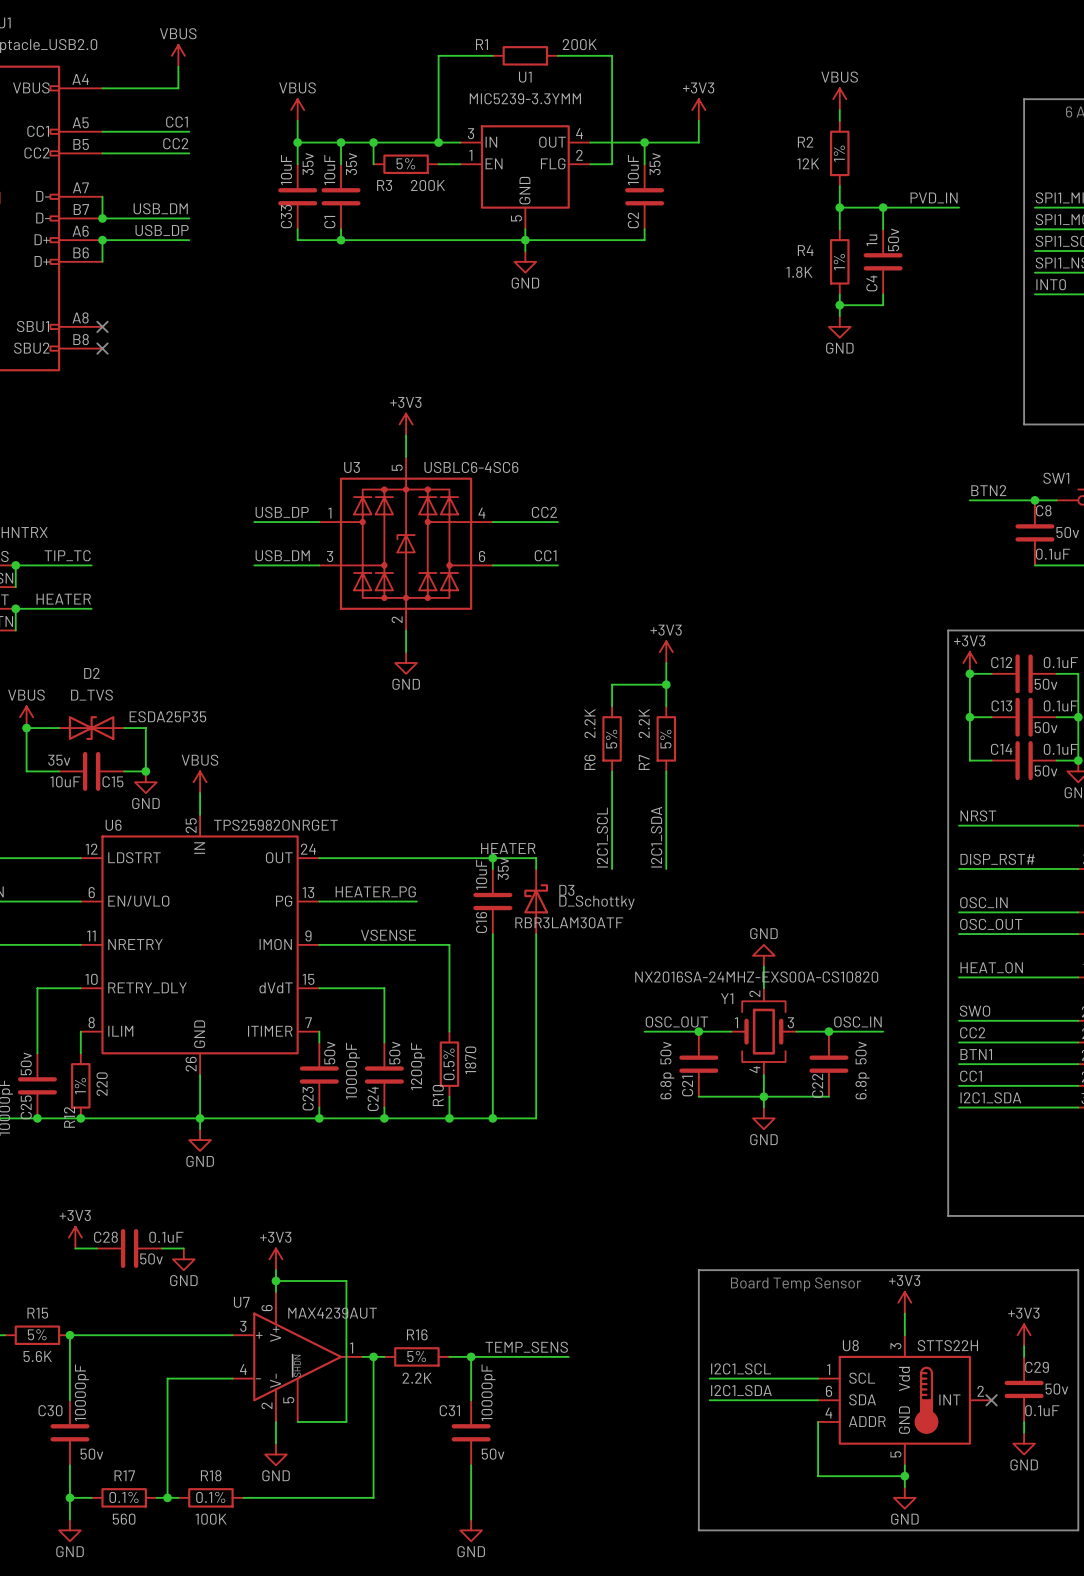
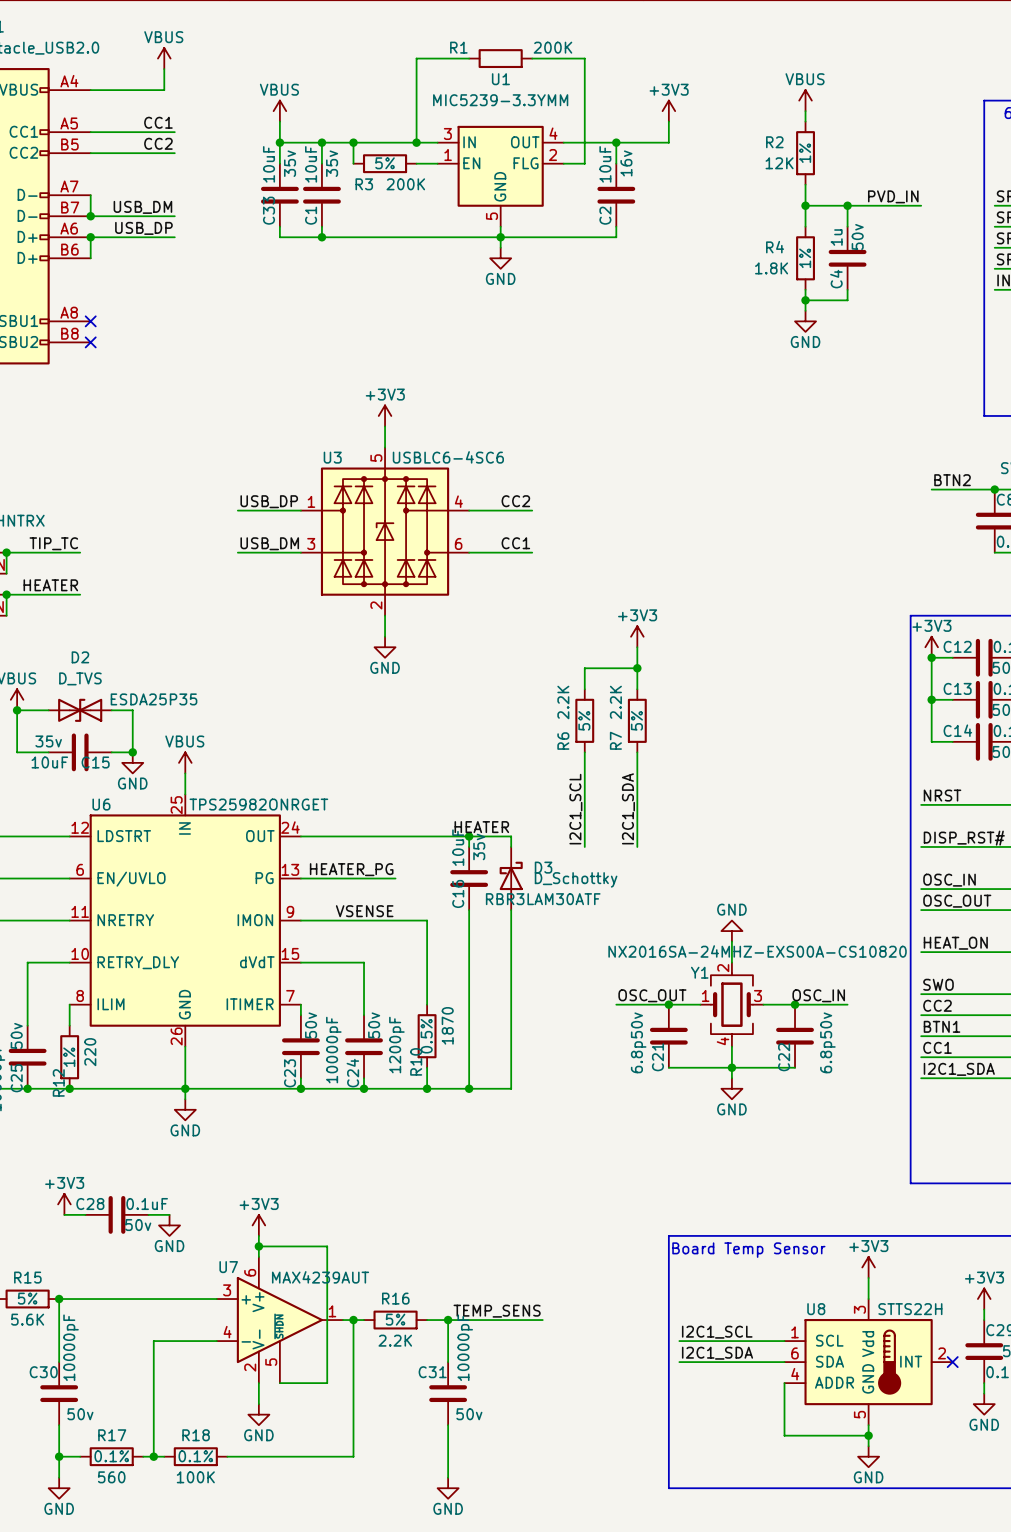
C2 text: 35v (655, 164) -> 16v (626, 163)

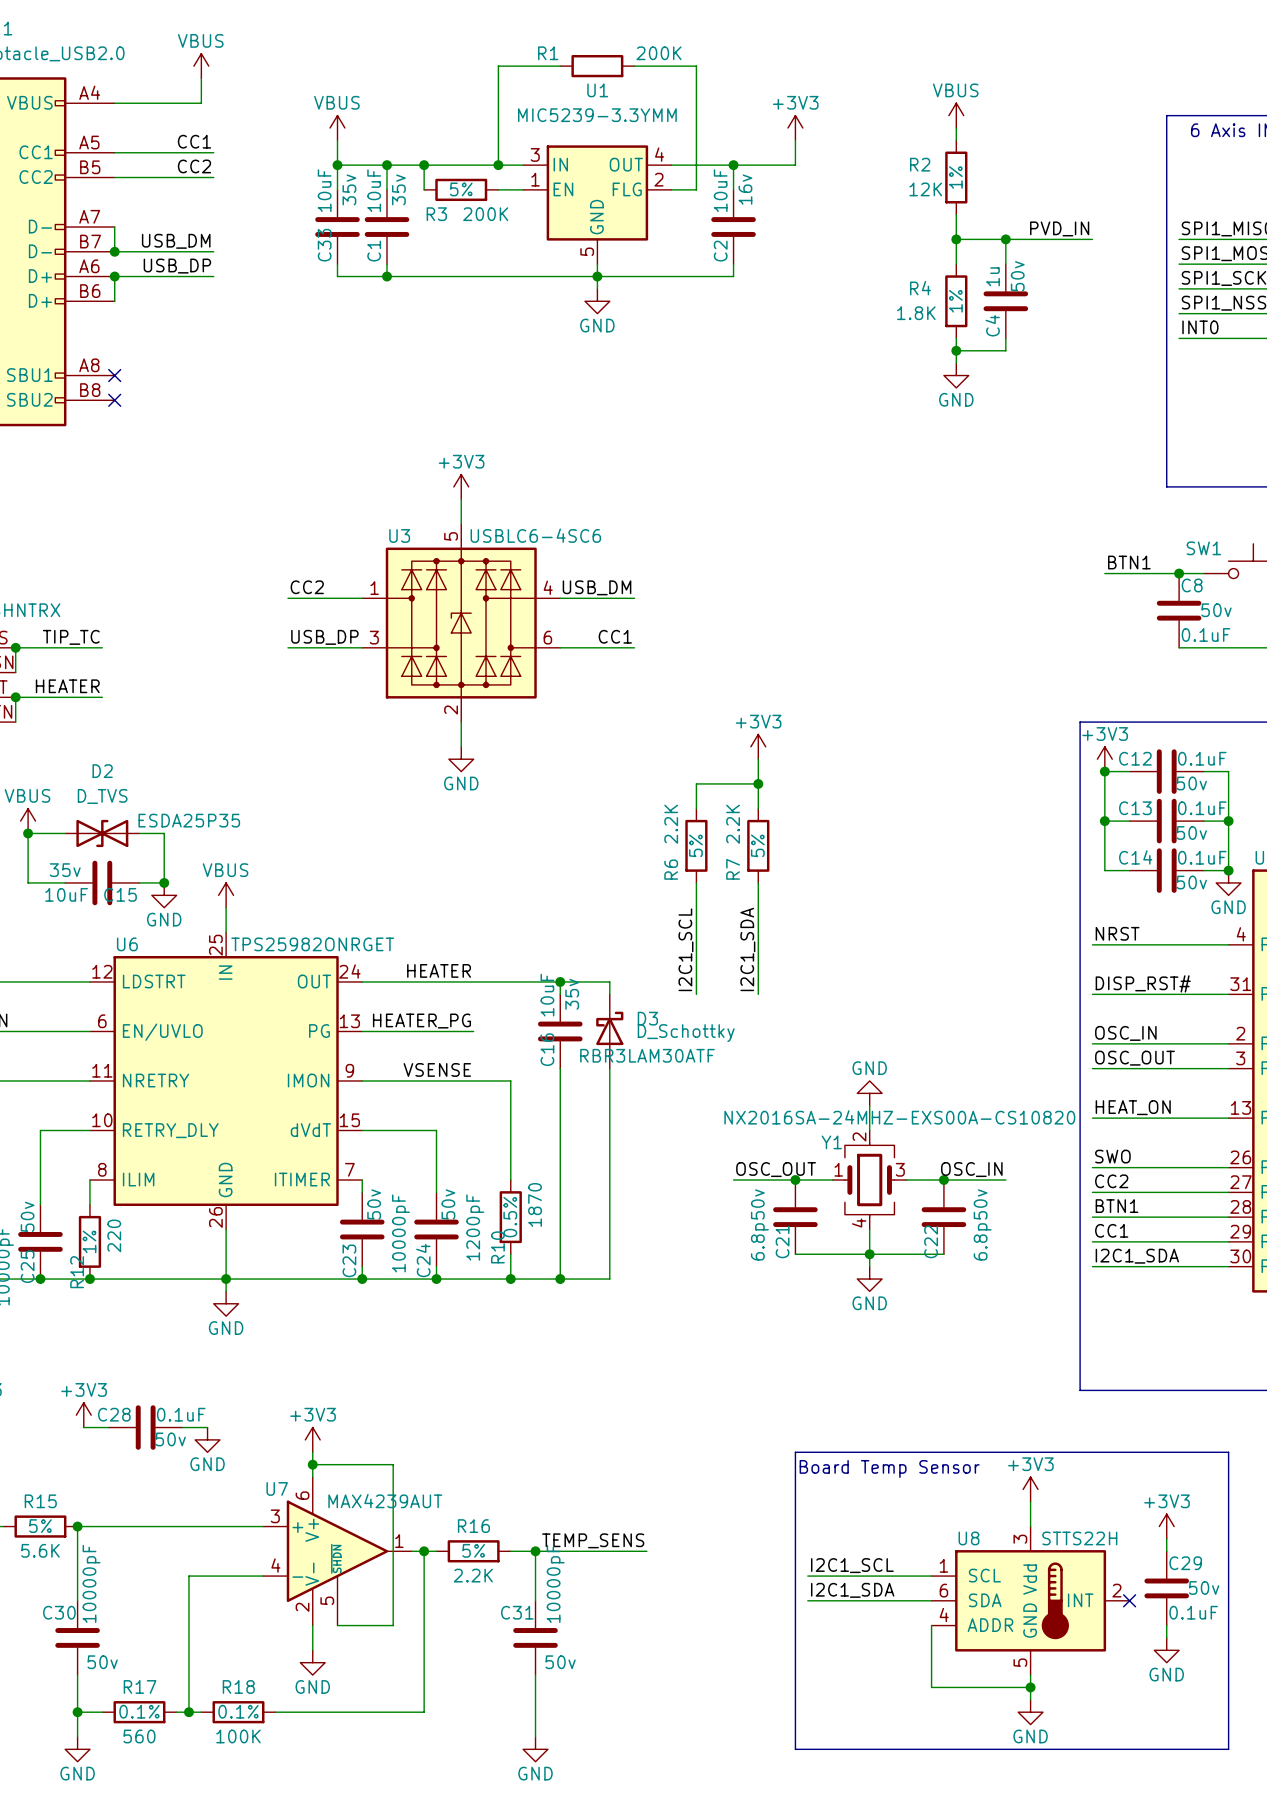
label: BTN2 (952, 480) -> BTN1 (1129, 562)
label: USB_DP (269, 501) -> CC2 (307, 587)
label: CC2 (515, 501) -> USB_DM (597, 587)
label: USB_DM (269, 543) -> USB_DP (324, 637)
label position: HEATER (481, 827) -> HEATER (439, 970)

